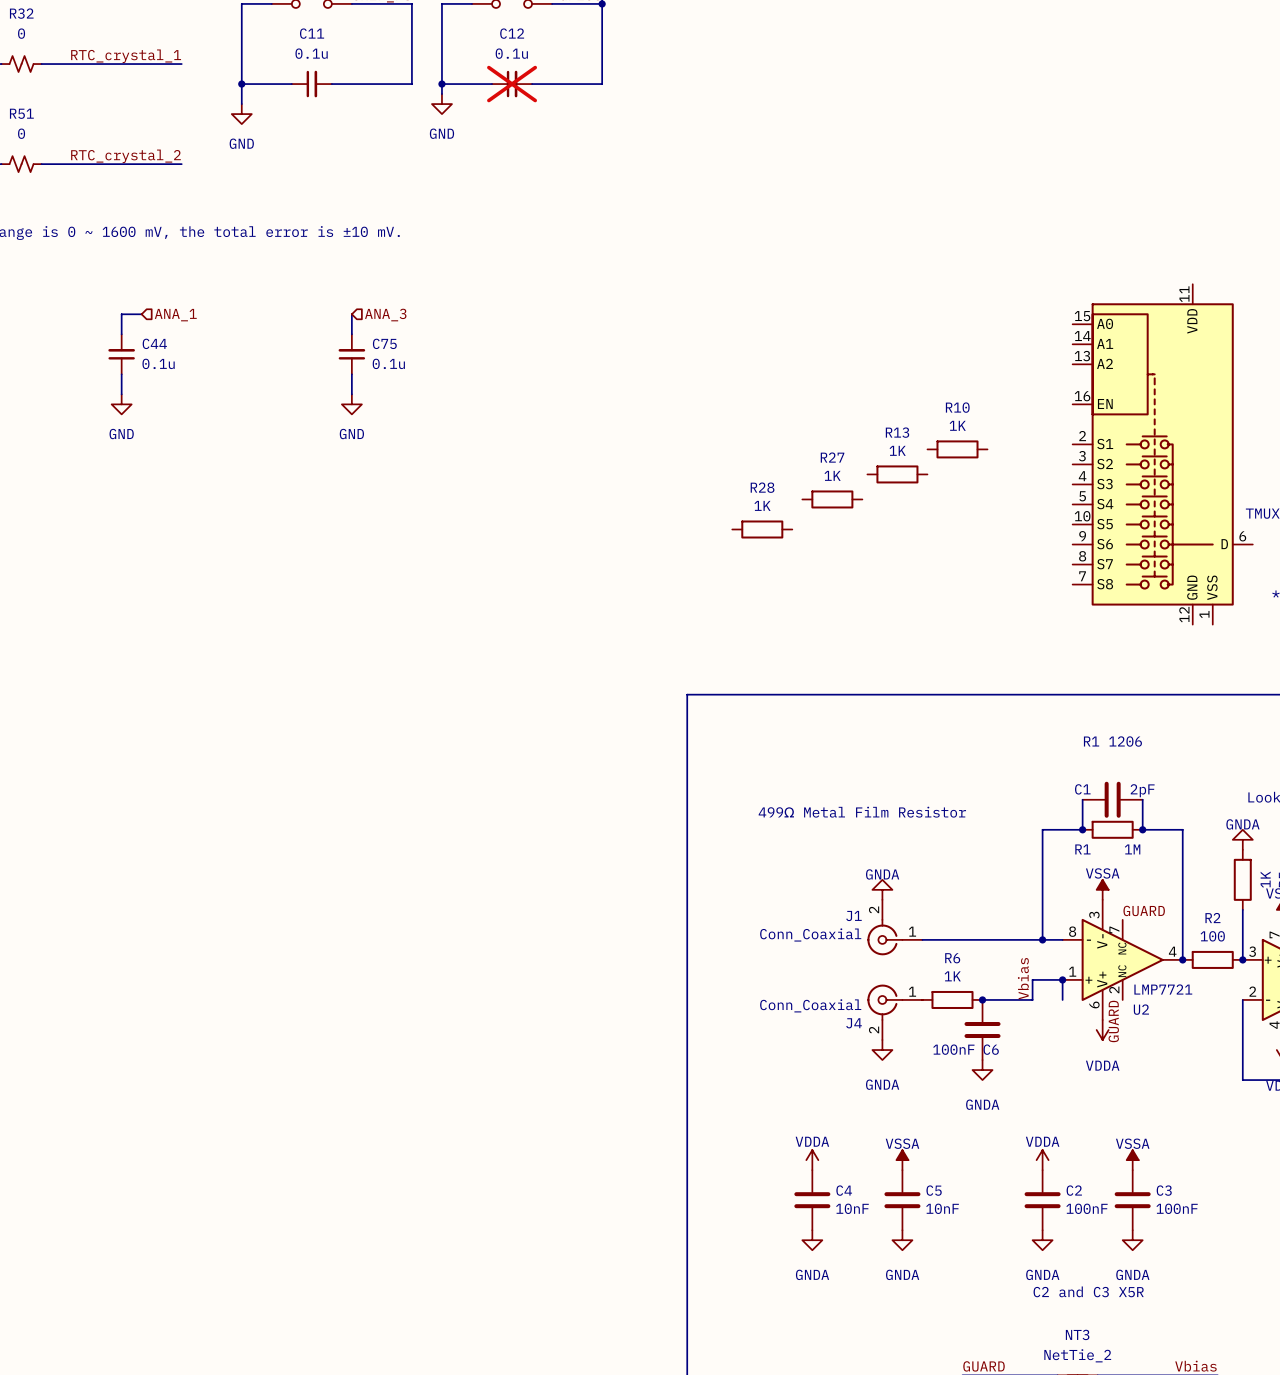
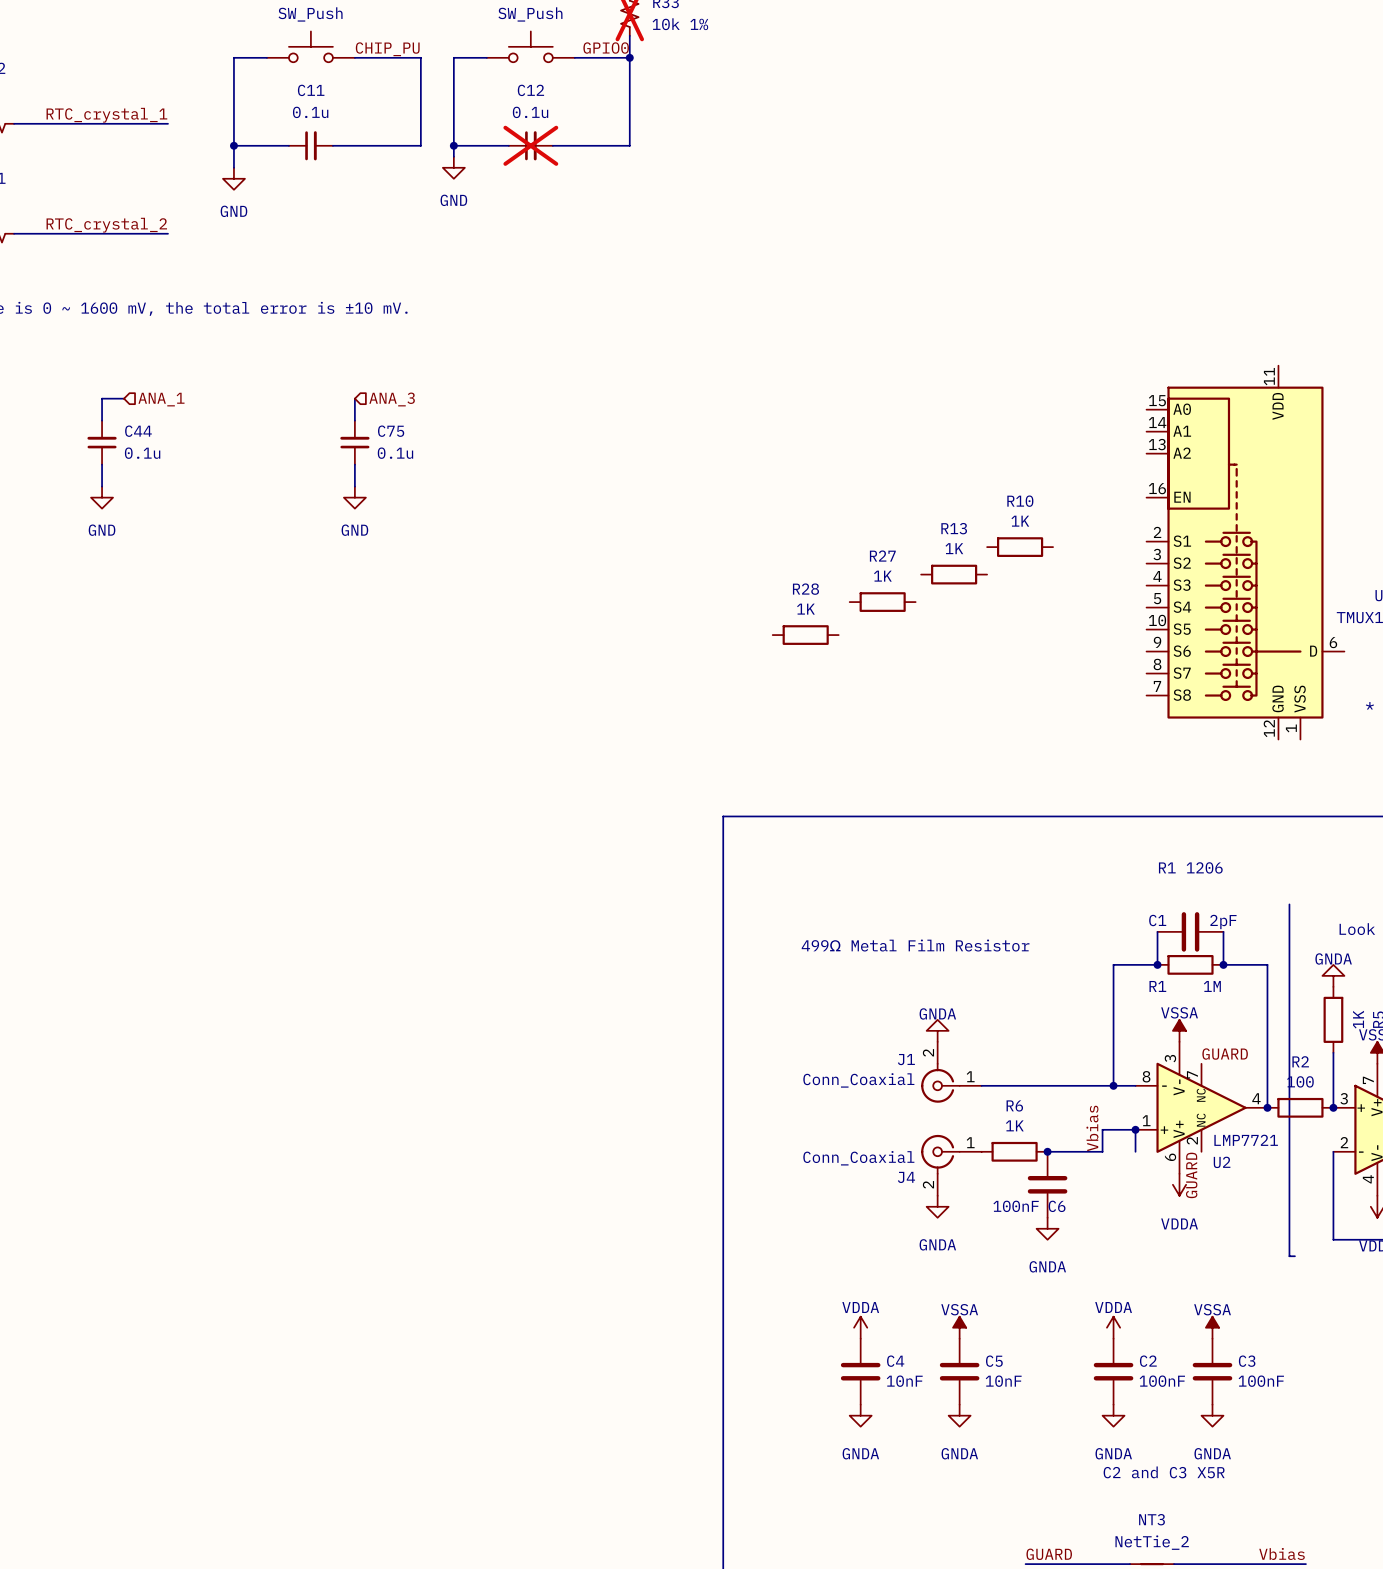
line: none -> (1289, 904) (1289, 1256) (1294, 1256)

